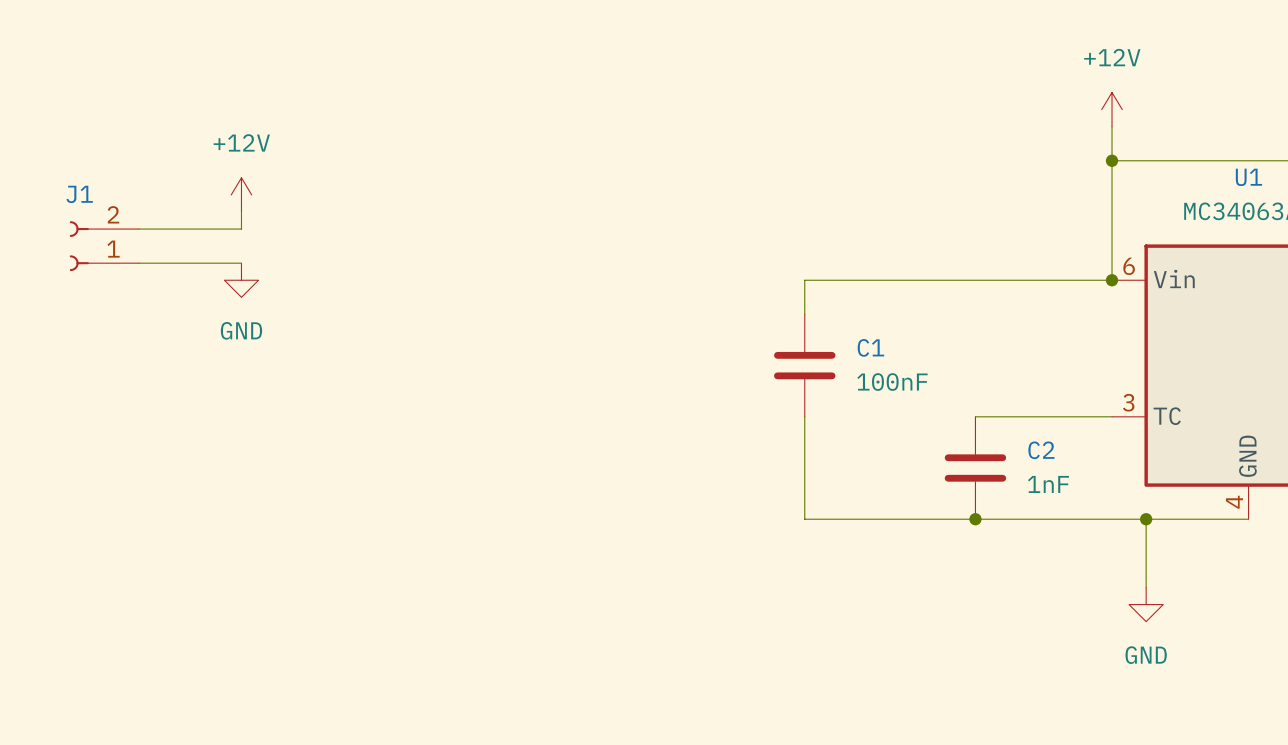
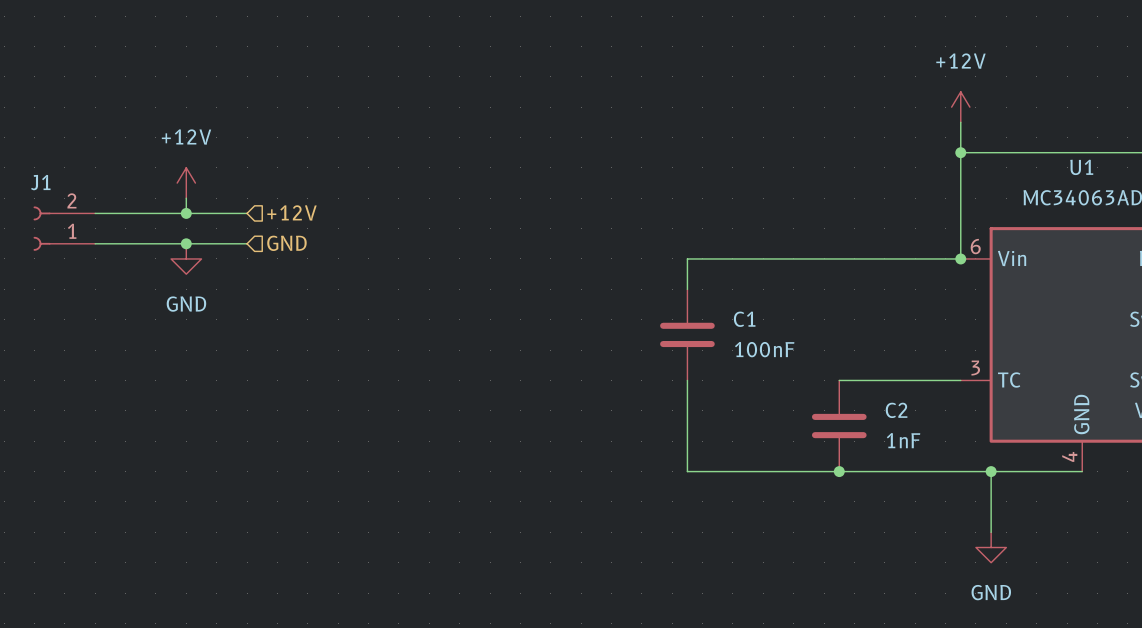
hierarchical label: none -> +12V (292, 212)
wire: none -> (186, 213) (247, 213)
junction: none -> (186, 213)
hierarchical label: none -> GND (286, 243)
wire: none -> (186, 243) (247, 243)
junction: none -> (186, 243)

